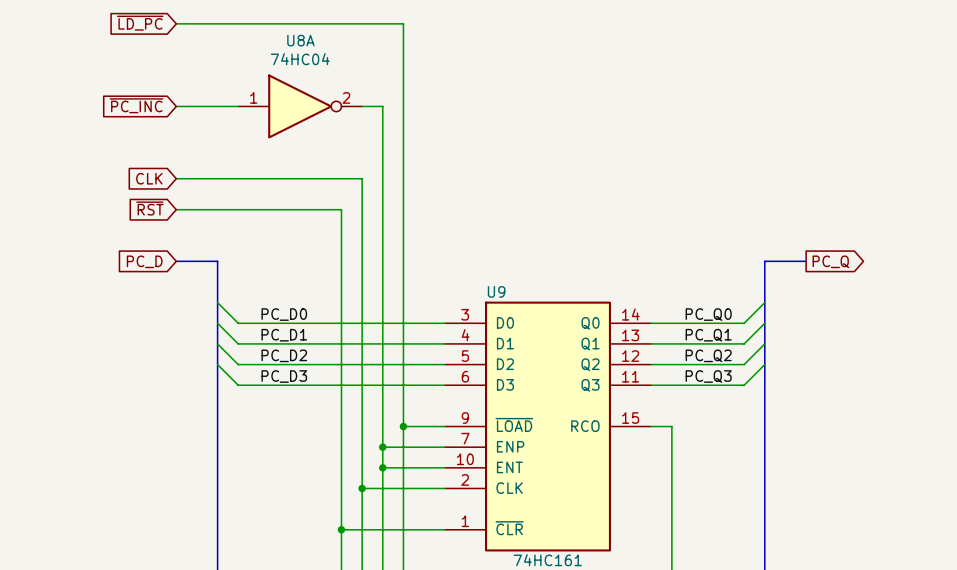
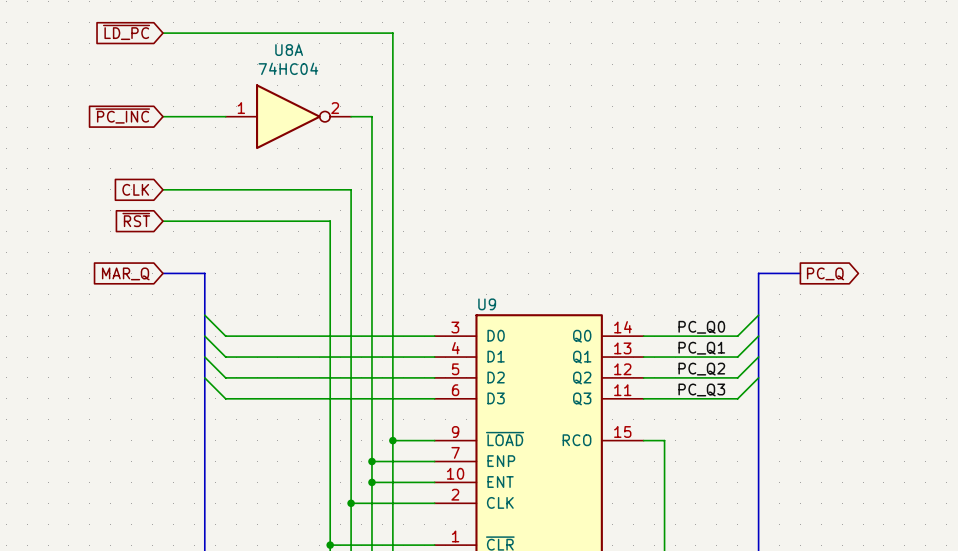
global label: PC_D (144, 261) -> MAR_Q (125, 273)
label: PC_D0 (284, 314) -> none
label: PC_D1 (284, 335) -> none
label: PC_D2 (284, 355) -> none
label: PC_D3 (284, 376) -> none

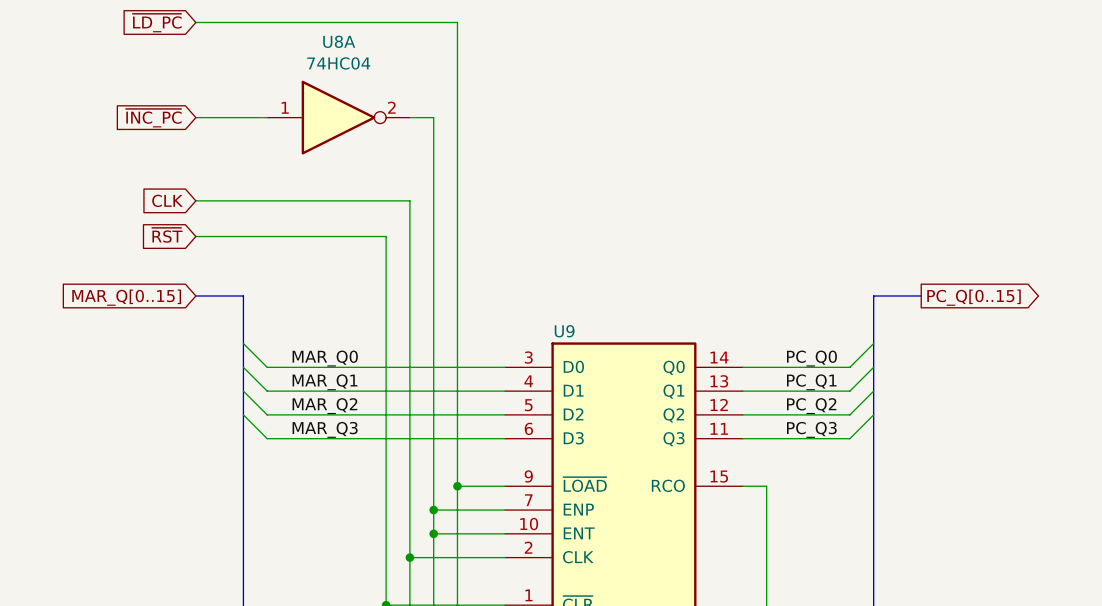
global label: ~{PC_INC} (122, 115) -> ~{INC_PC} (153, 118)
global label: MAR_Q (125, 273) -> MAR_Q[0..15] (126, 297)
global label: PC_Q (825, 273) -> PC_Q[0..15] (974, 297)
label: none -> MAR_Q0 (325, 358)
label: none -> MAR_Q1 (325, 382)
label: none -> MAR_Q2 (324, 406)
label: none -> MAR_Q3 (325, 429)

